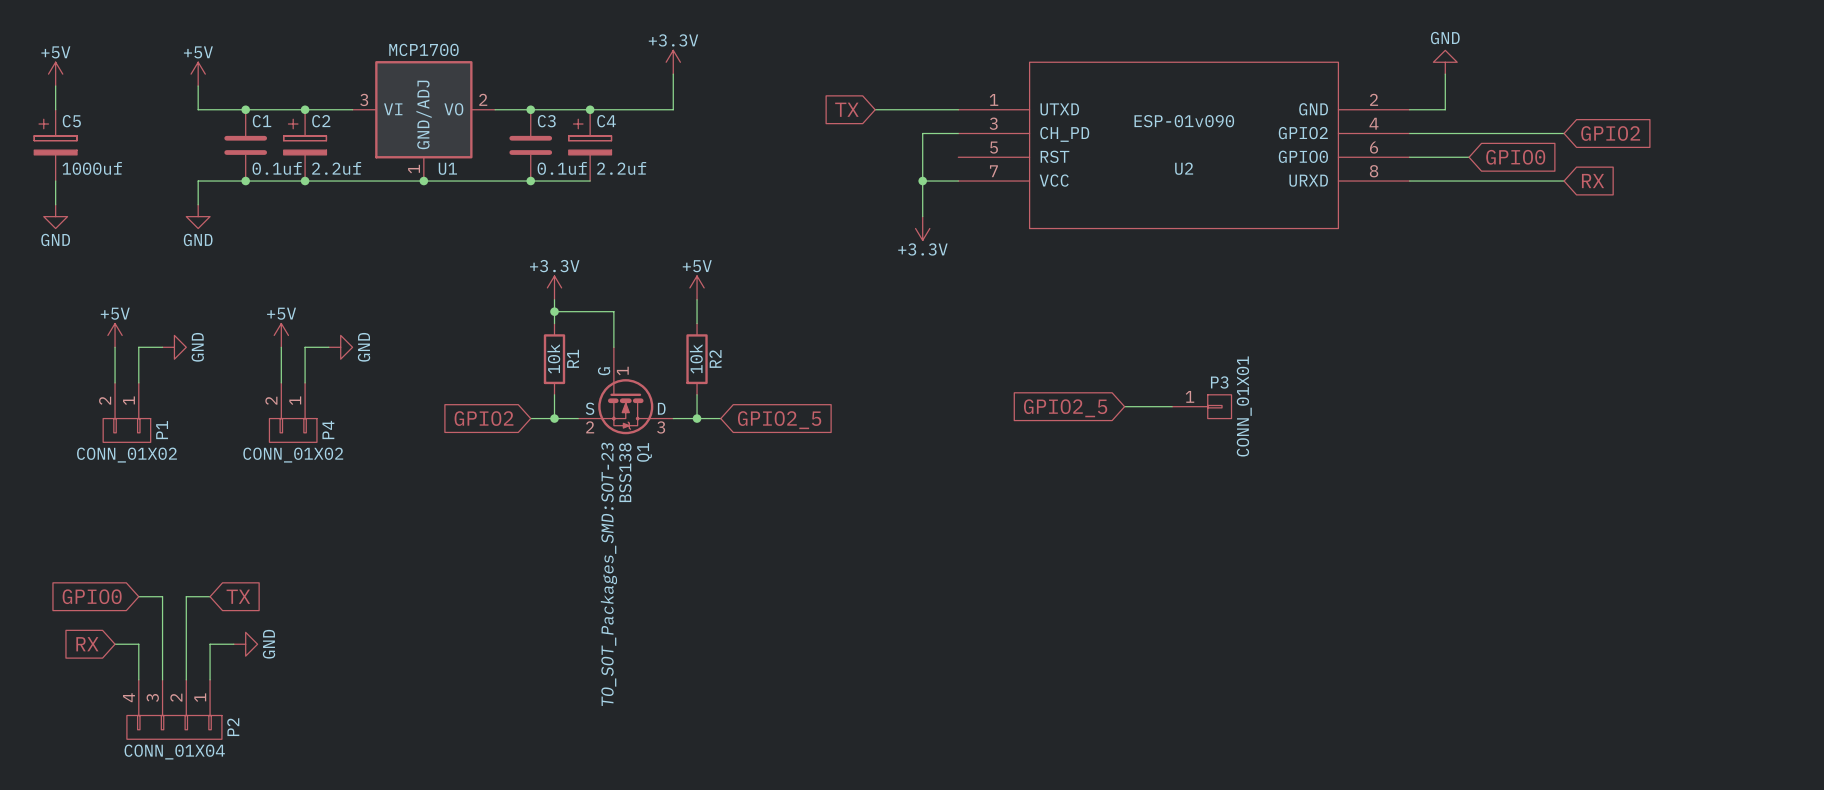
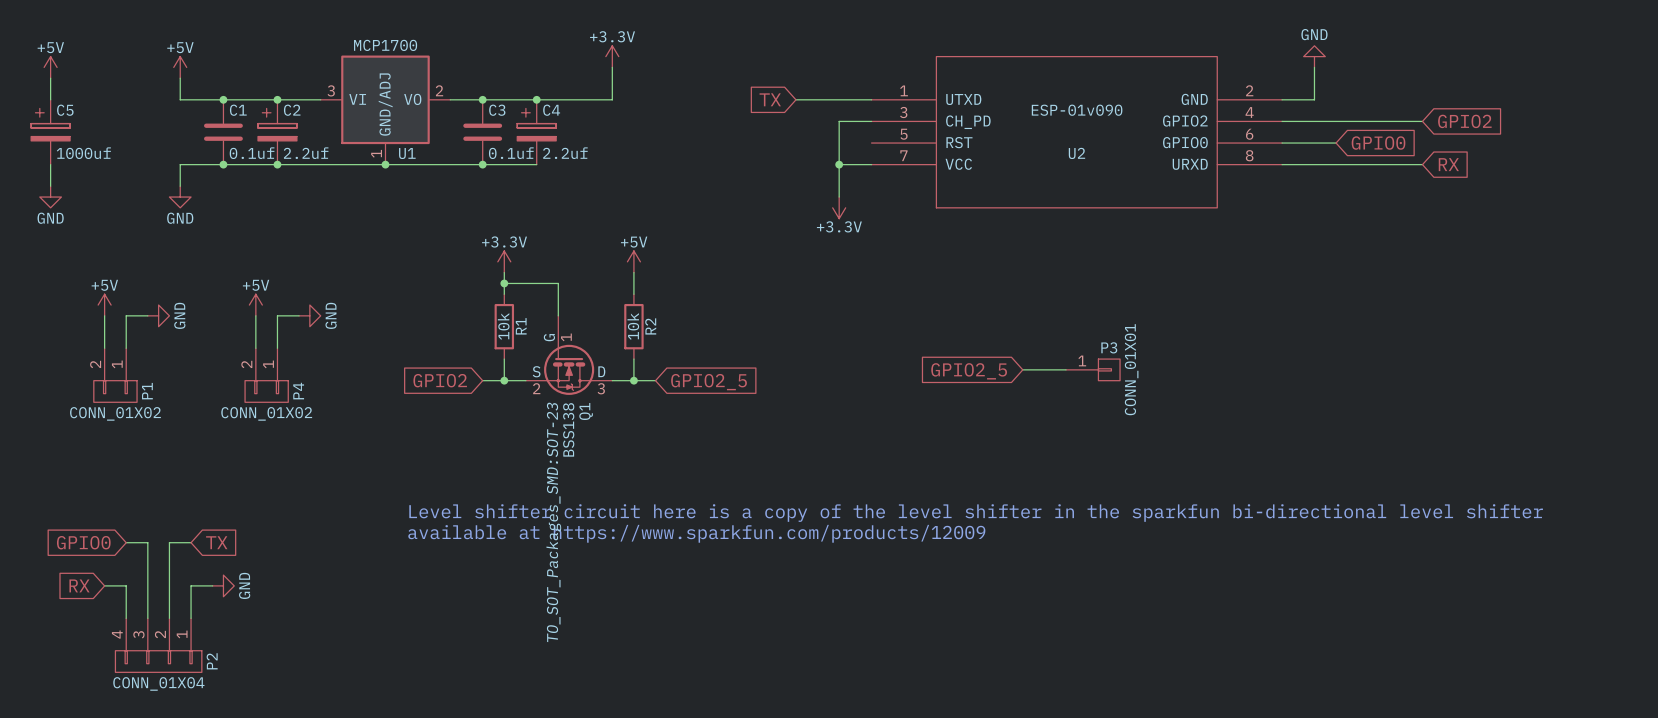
text: none -> Level shifter circuit here is a copy of the level shifter in the sparkfun bi-directional level shifter (976, 513)
text: none -> available at https://www.sparkfun.com/products/12009 (696, 533)

